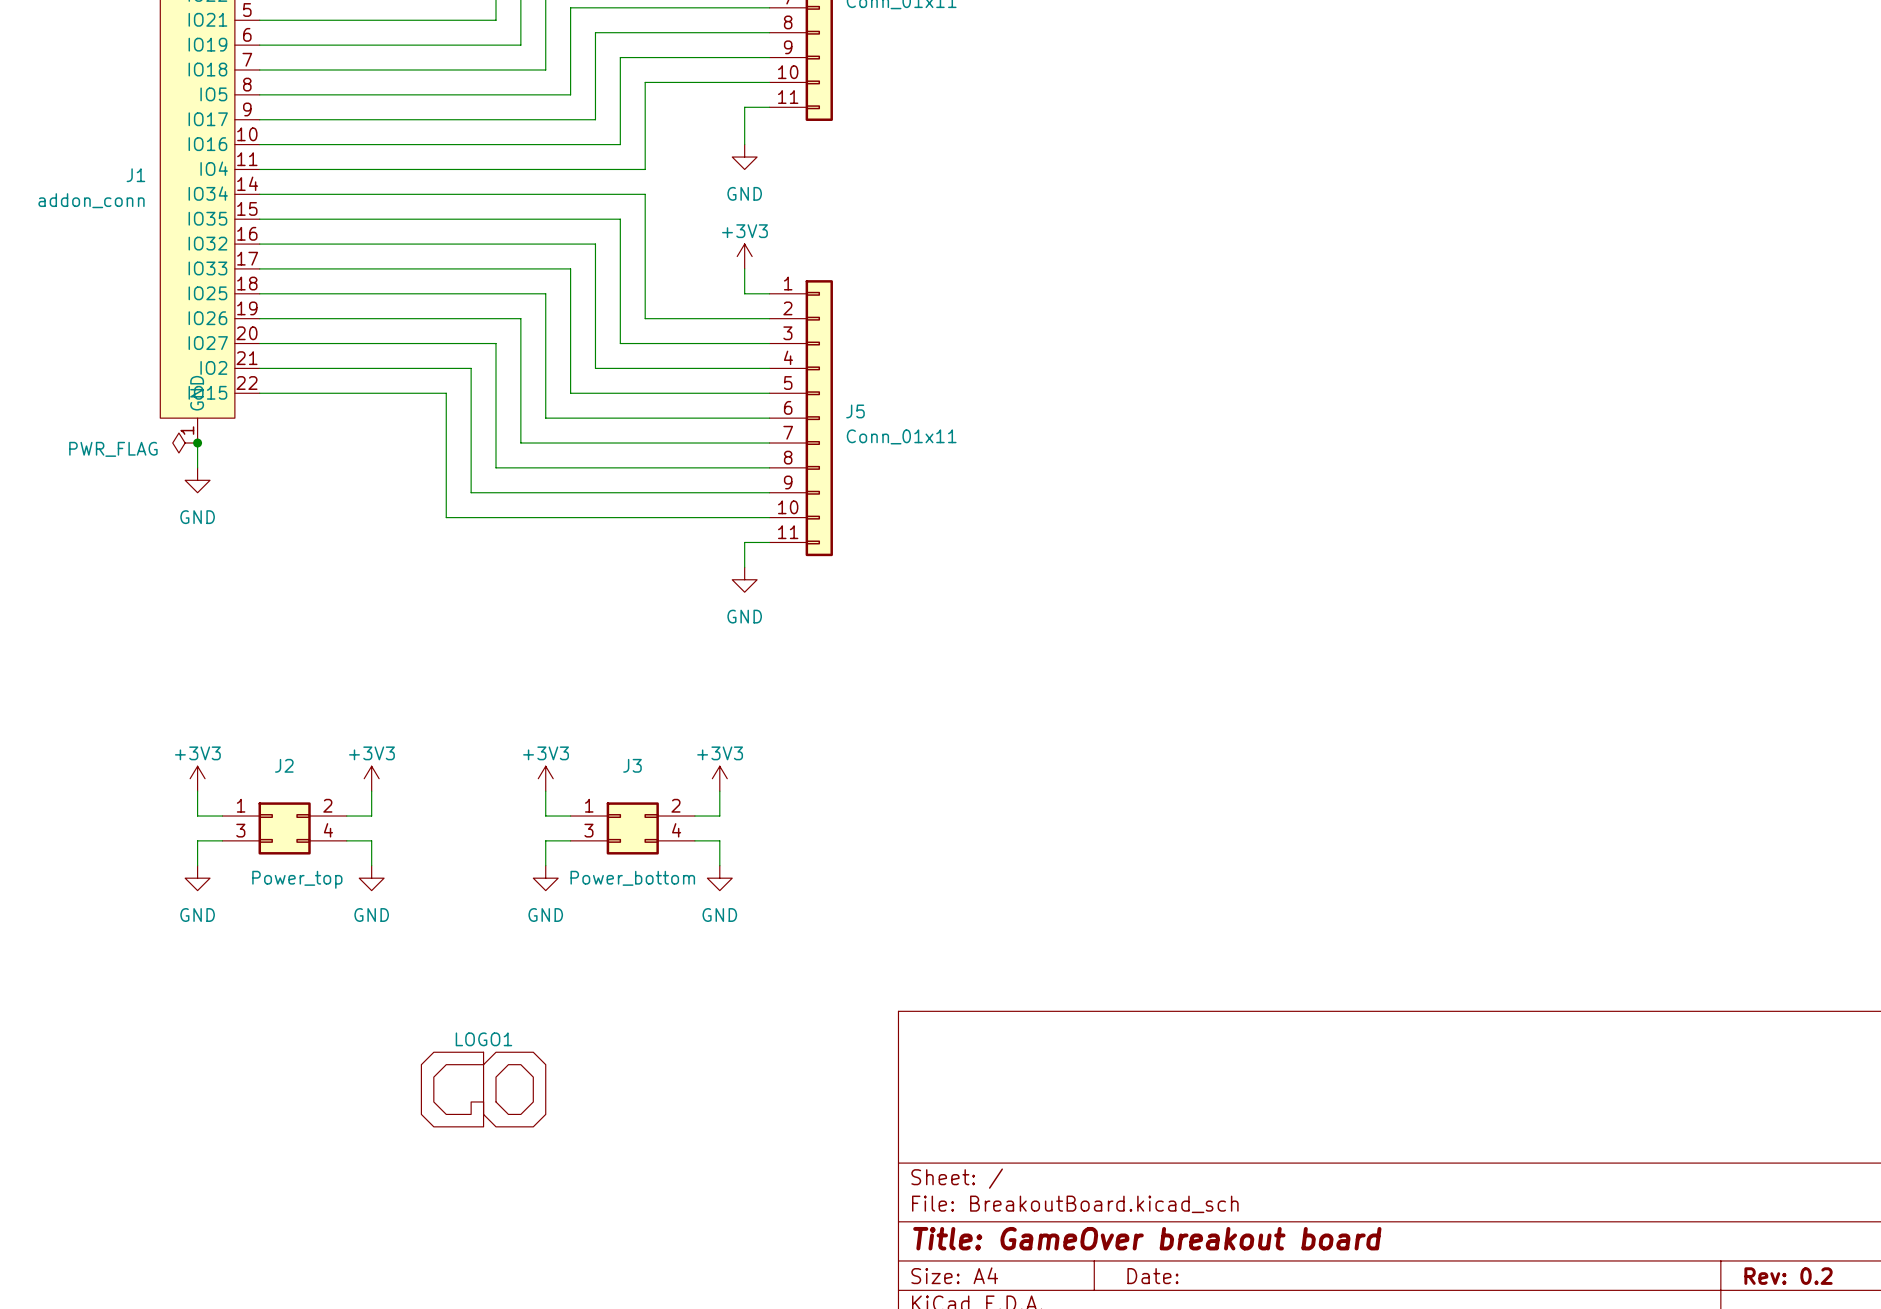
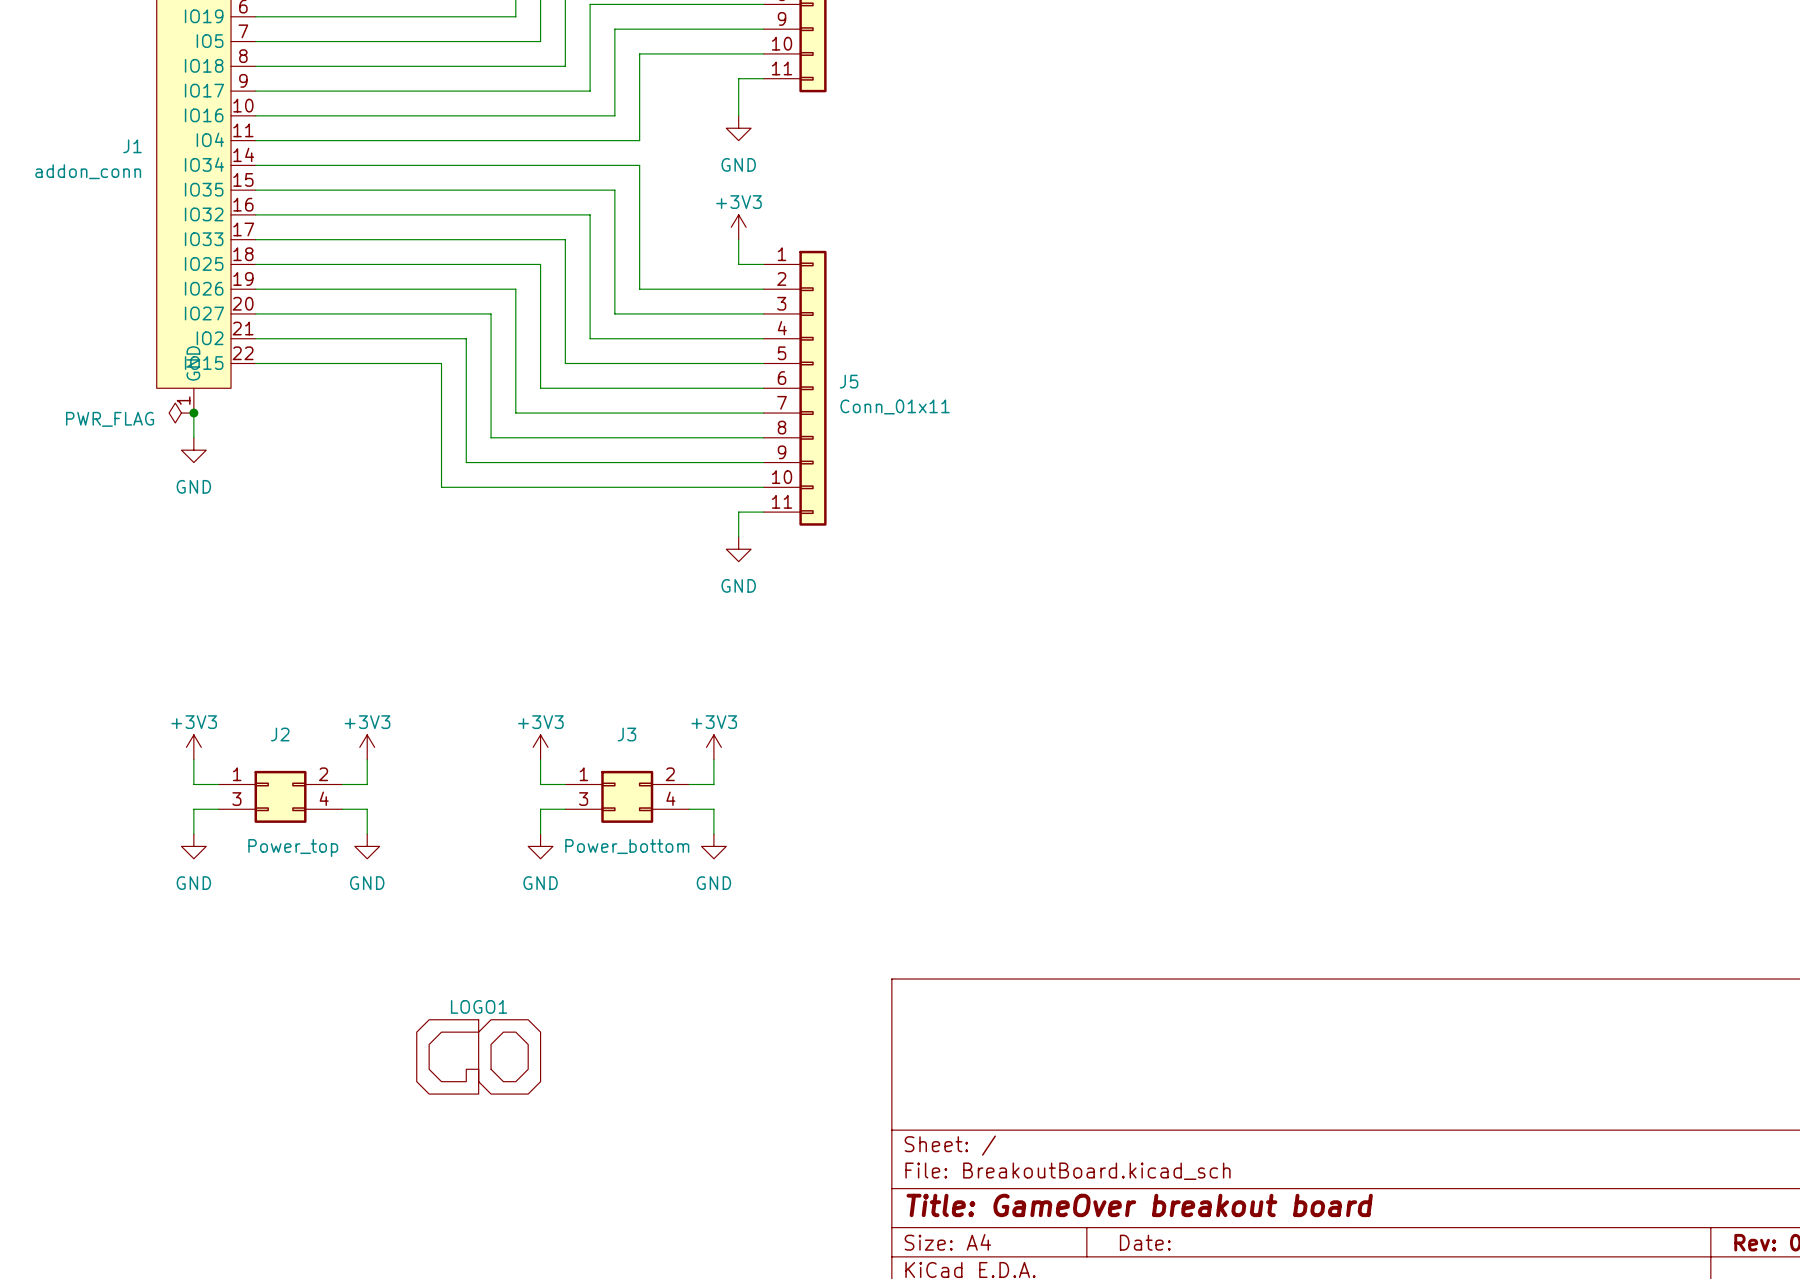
J1 pin name: IO18 (207, 69) -> IO5 (210, 41)
J1 pin name: IO5 (213, 94) -> IO18 (204, 65)

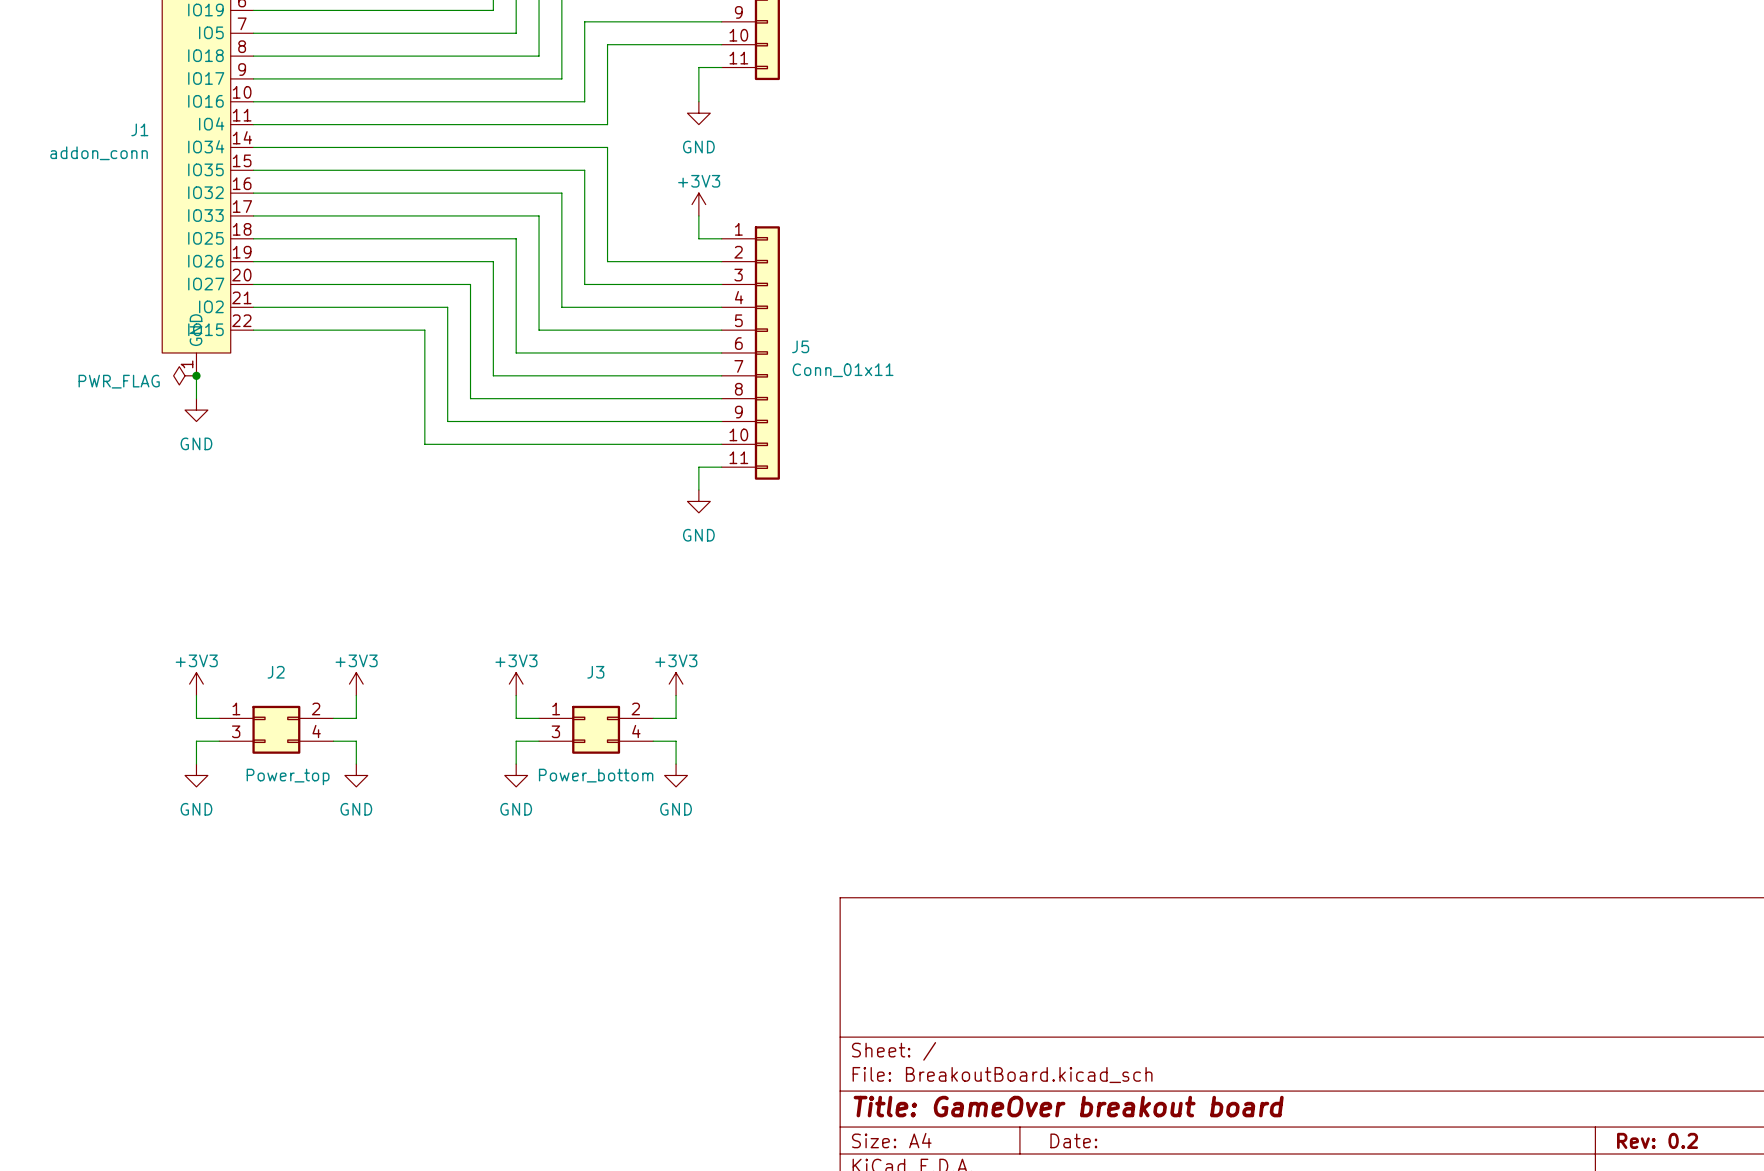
LOGO1: (478, 1056) -> none

